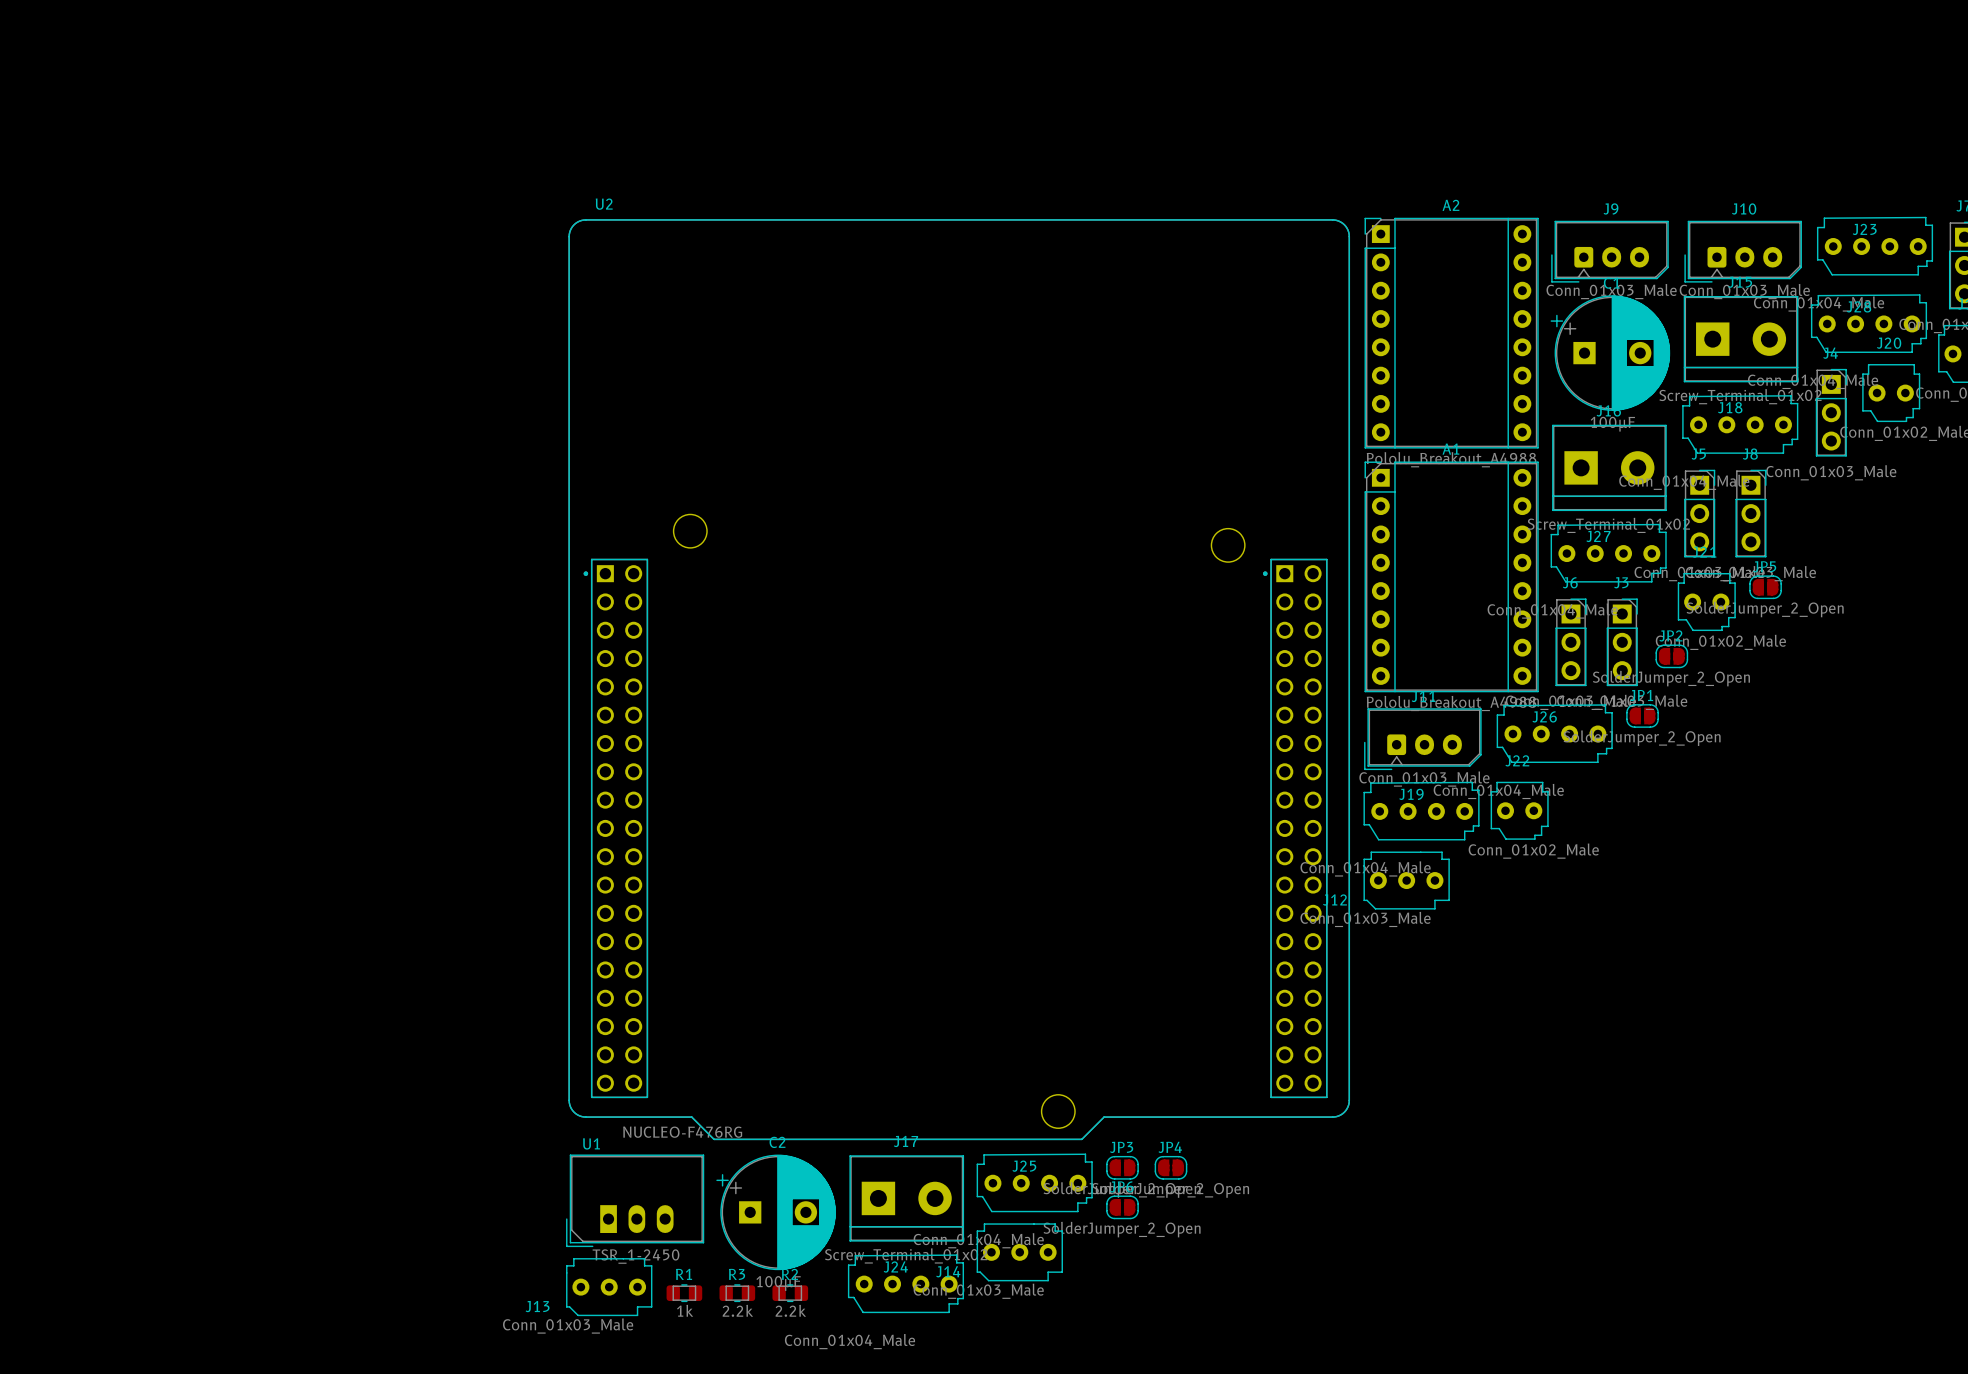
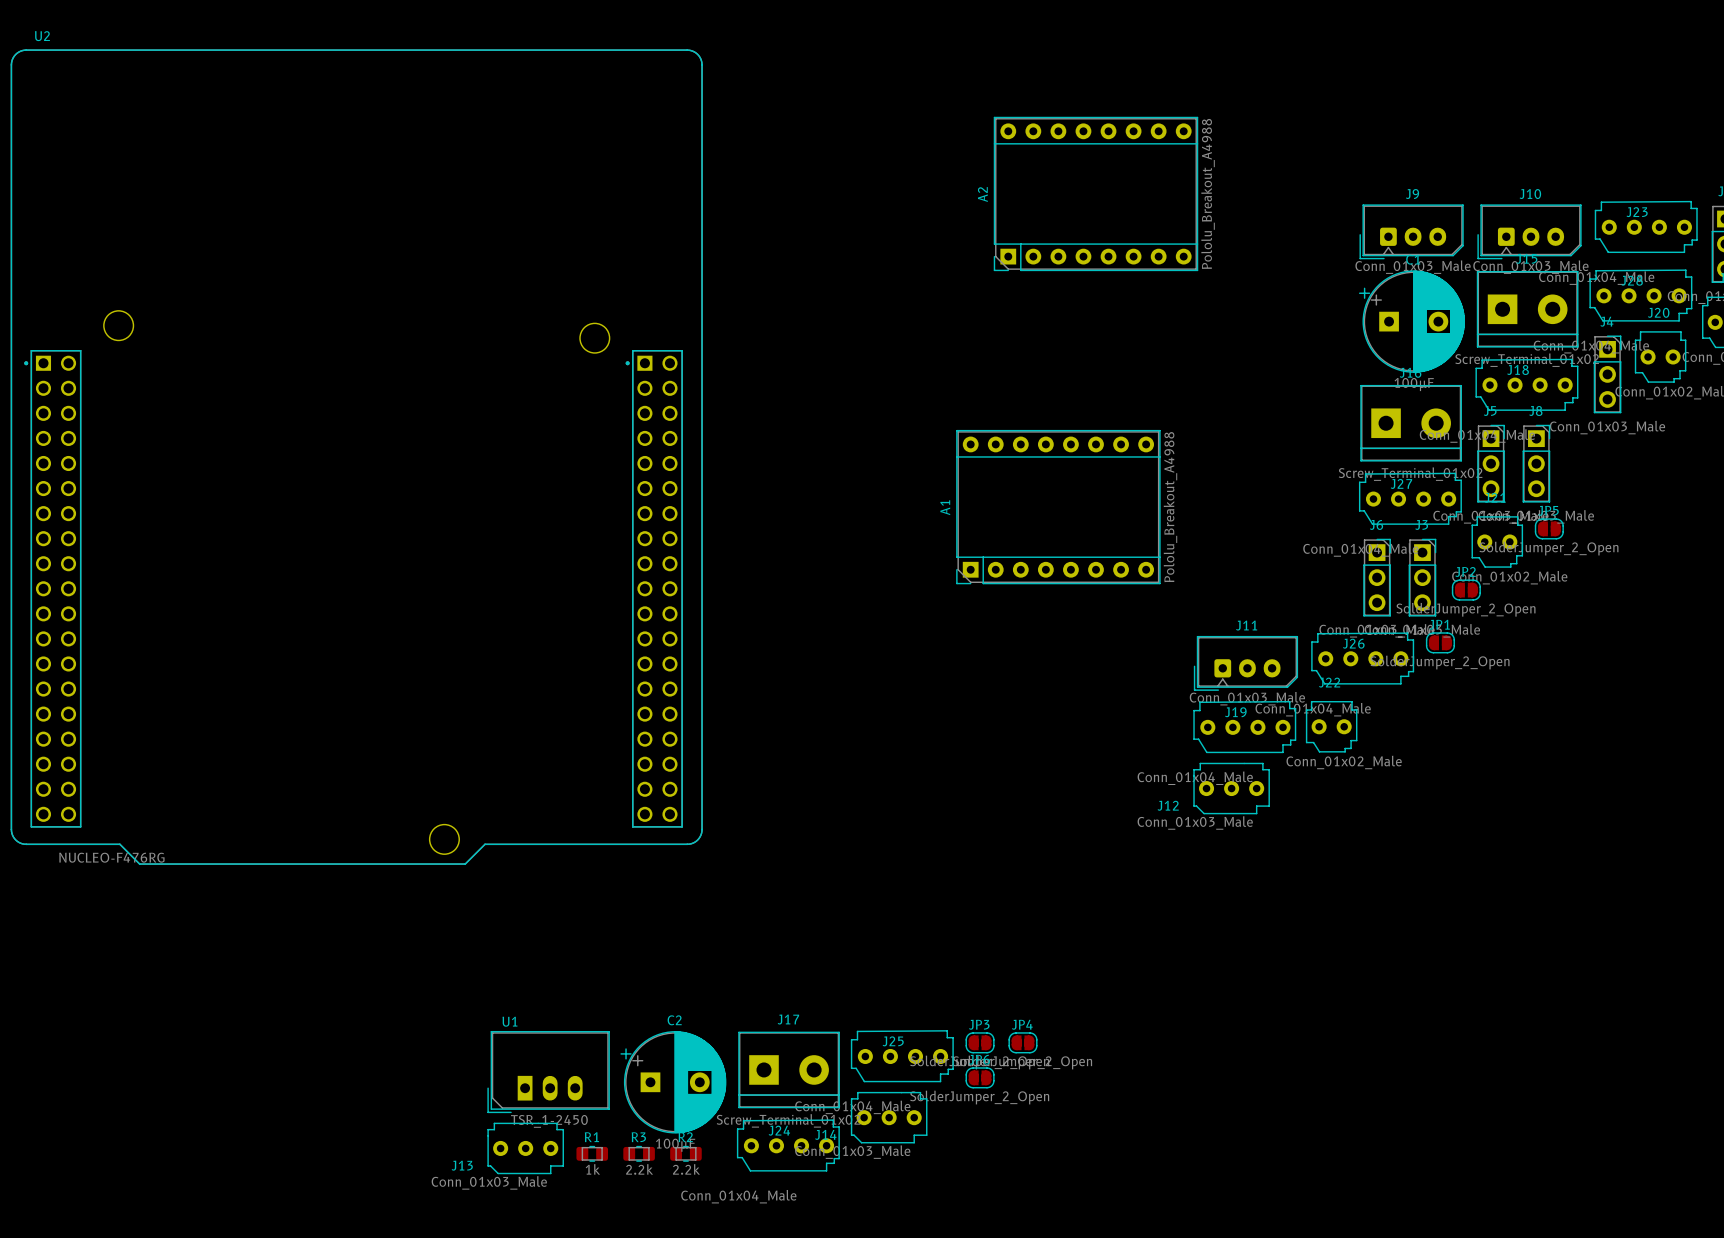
A2 rotation: 0° (1451, 333) -> 90° counterclockwise (1095, 193)
A2 position: (1451, 333) -> (1095, 193)
A1 rotation: 0° (1451, 576) -> 90° counterclockwise (1058, 507)
A1 position: (1451, 576) -> (1058, 507)
U2 position: (959, 679) -> (356, 457)

